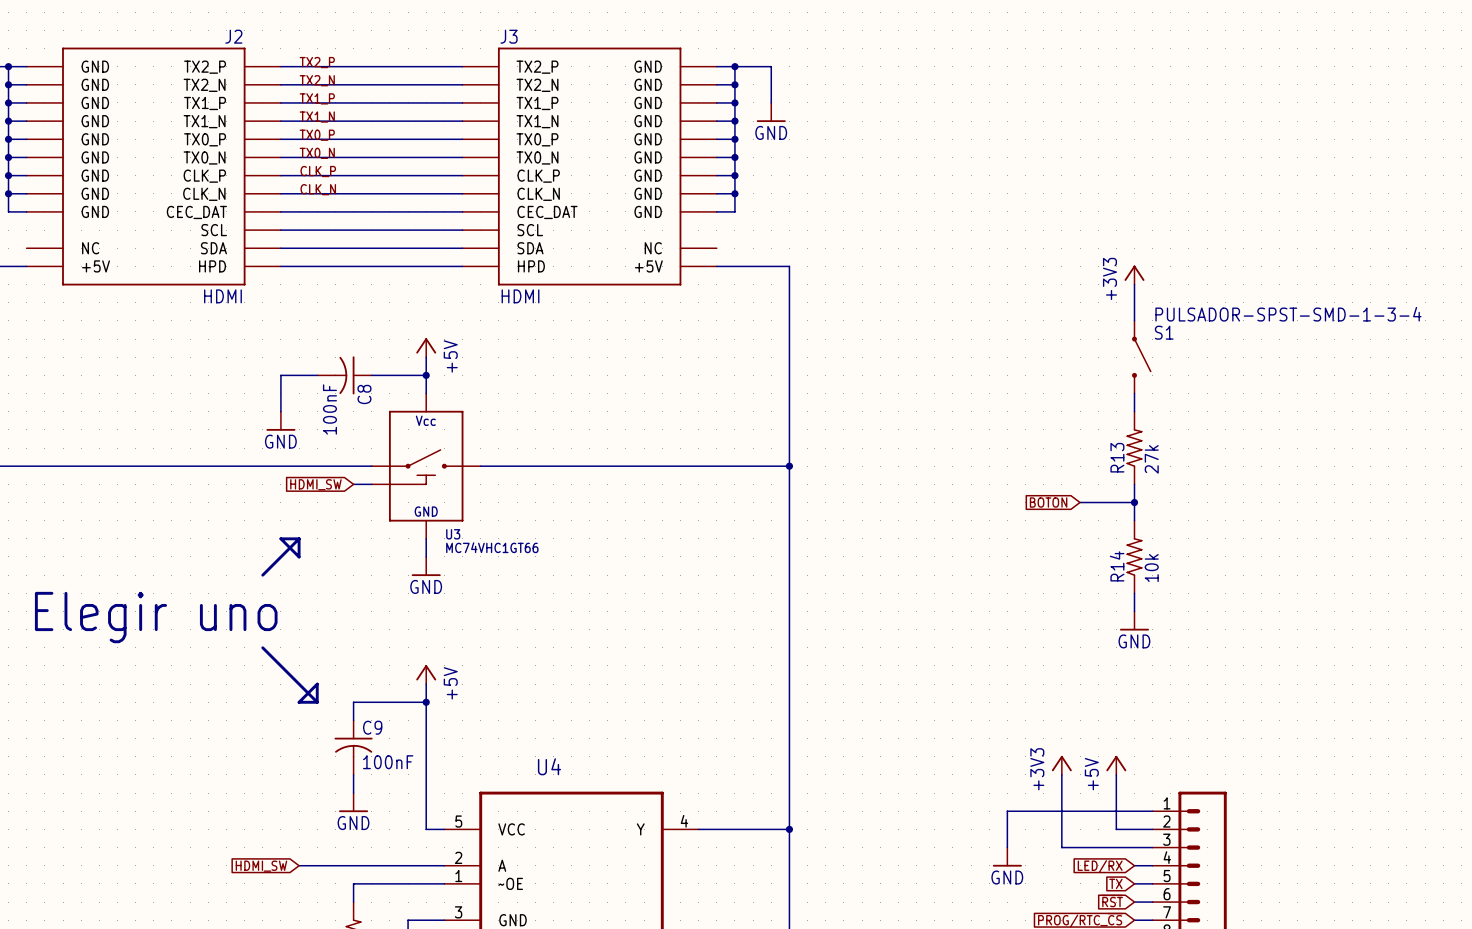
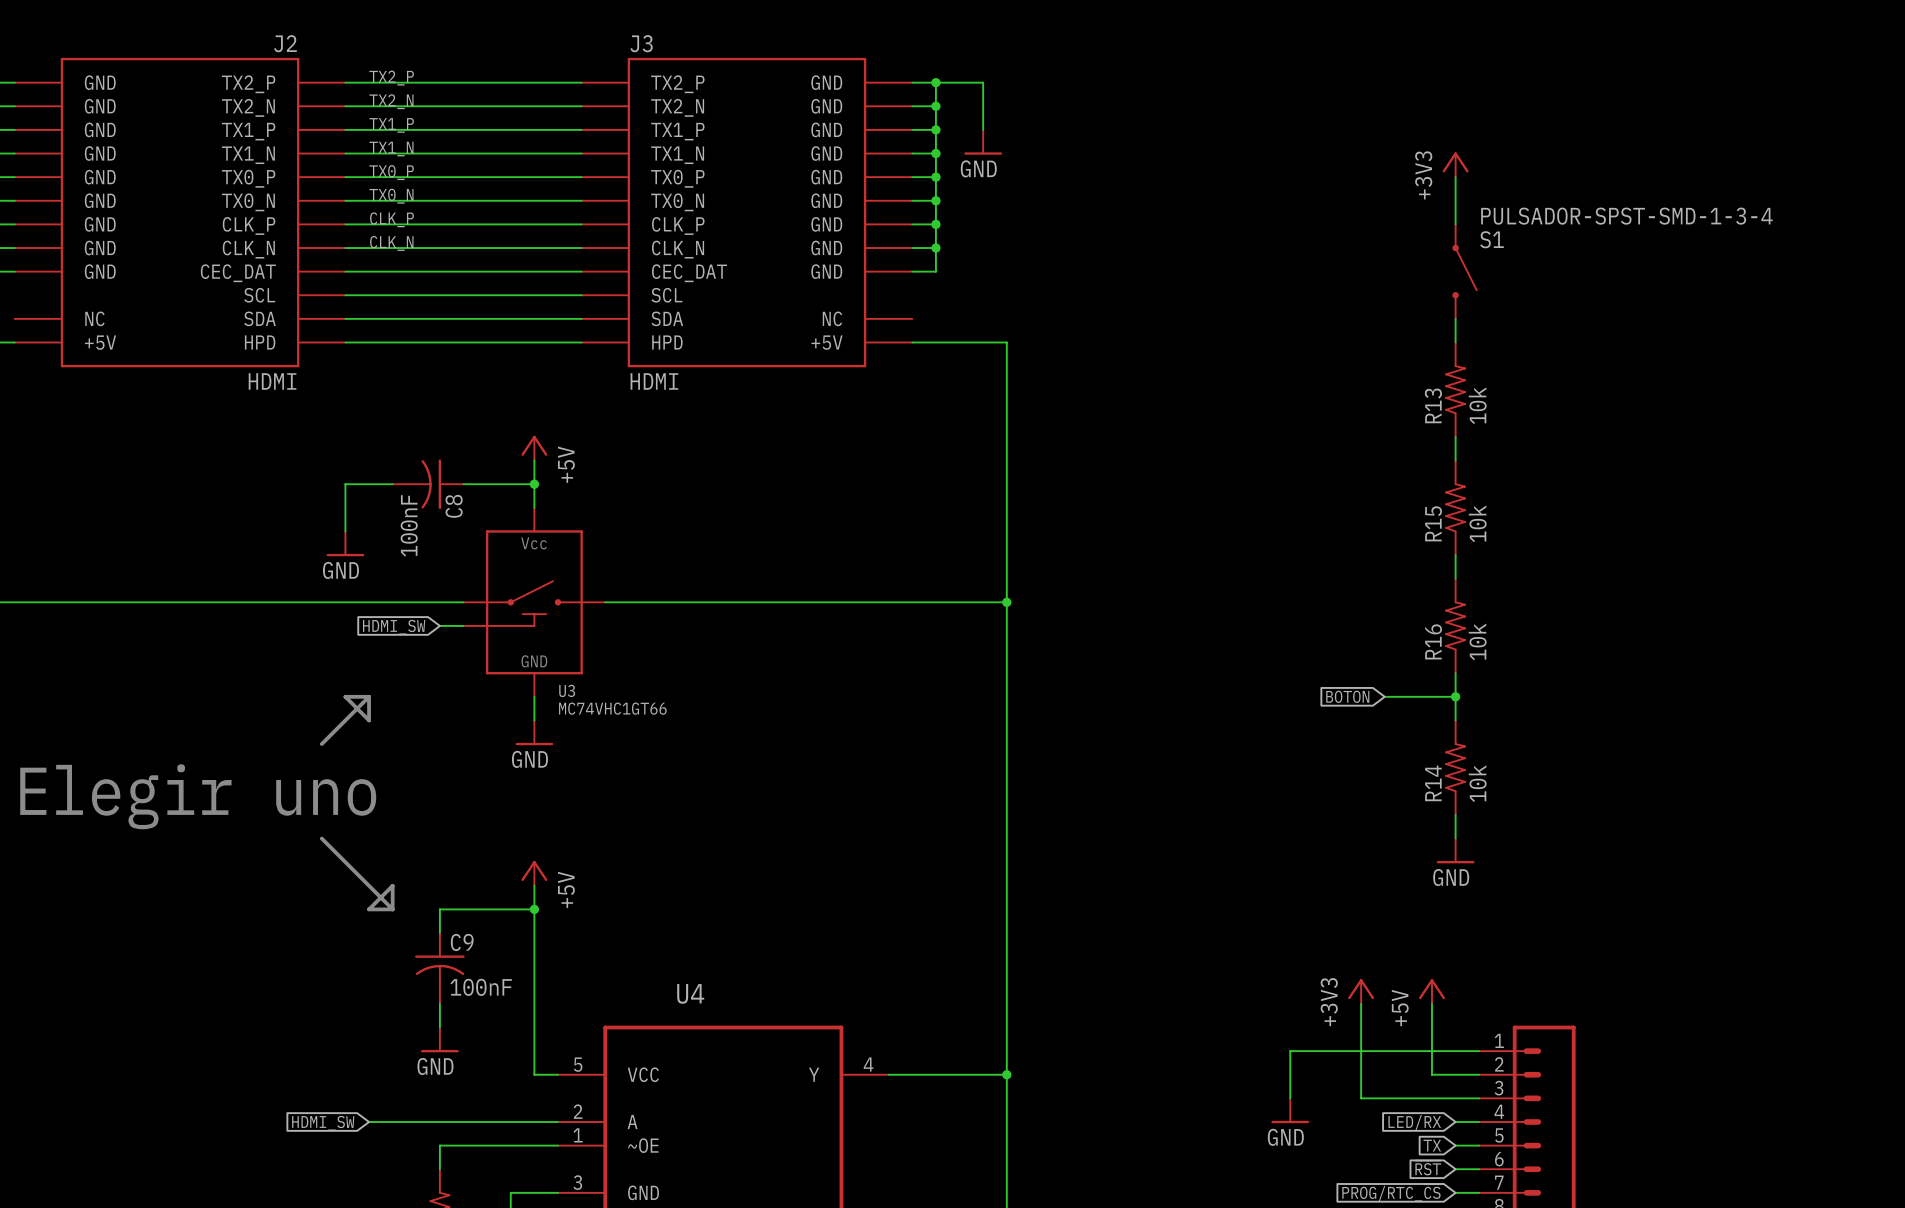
wire: none -> (1455, 318) (1455, 342)
power symbol position: +3V3 (1134, 275) -> +3V3 (1455, 164)
wire: (1134, 284) (1134, 320) -> (1455, 177) (1455, 224)
wire: none -> (1455, 436) (1455, 460)
S1 position: (1141, 357) -> (1464, 271)
wire: (1134, 393) (1134, 411) -> (1455, 555) (1455, 578)
R15: none -> 10k (1455, 507)
R13 position: (1134, 448) -> (1455, 389)
R13 value: 27k (1151, 459) -> 10k (1477, 405)
R16: none -> 10k (1455, 625)
global label position: BOTON (1048, 502) -> BOTON (1347, 696)
wire: (1080, 502) (1134, 502) -> (1384, 696) (1455, 696)
junction position: (1134, 502) -> (1455, 696)
R14 position: (1134, 556) -> (1455, 767)
power symbol position: GND (1134, 621) -> GND (1455, 850)

